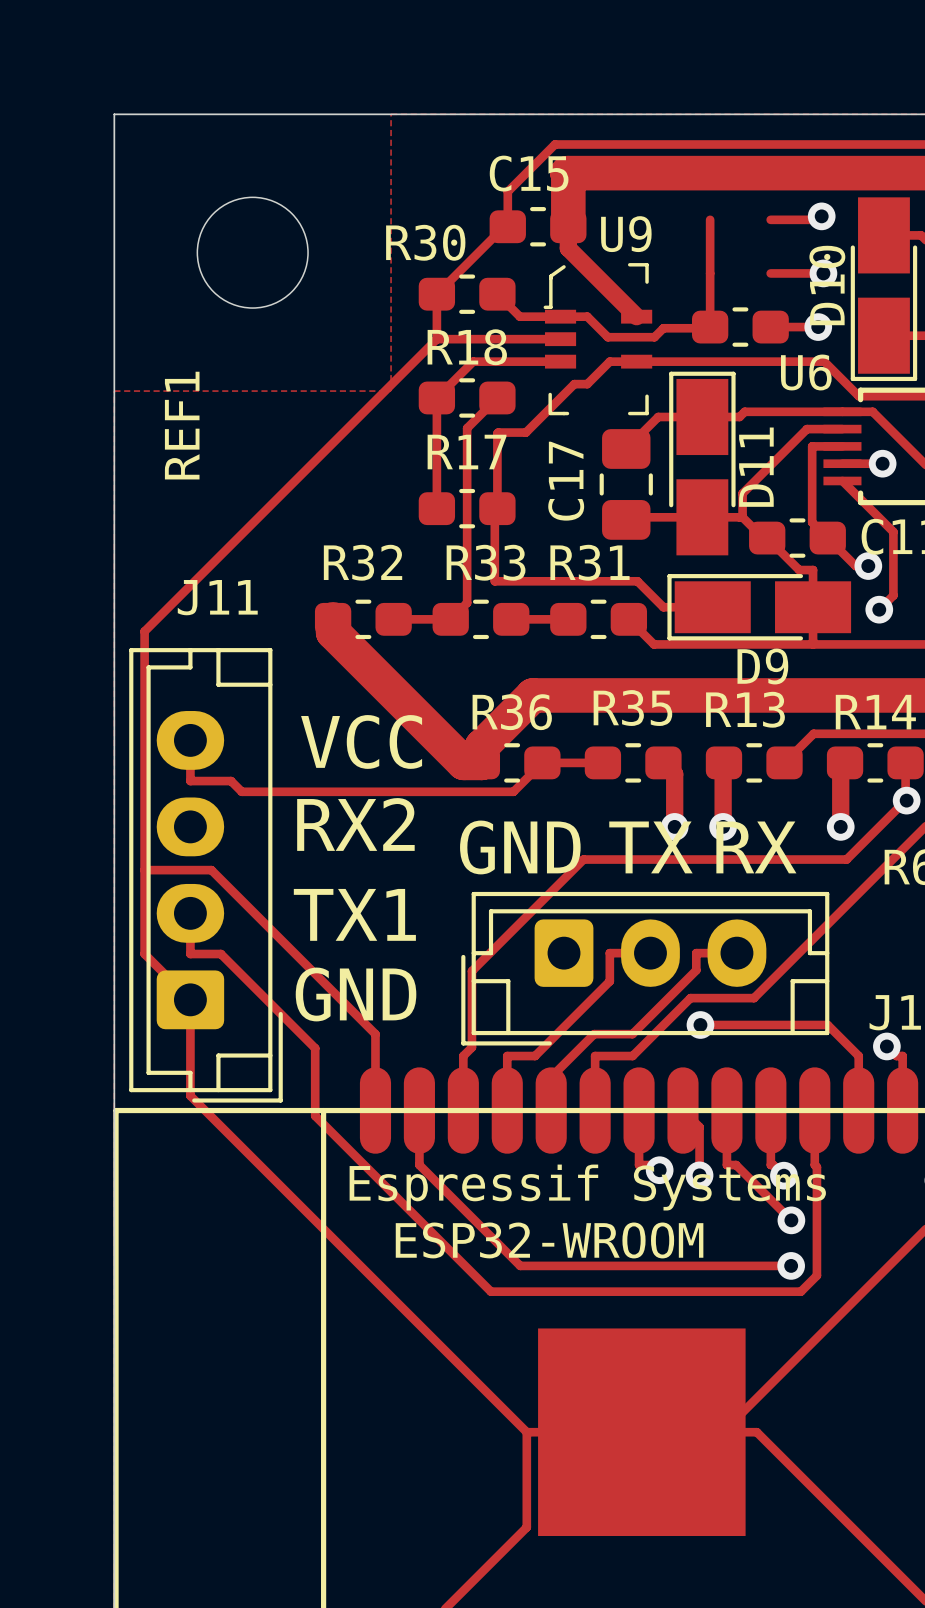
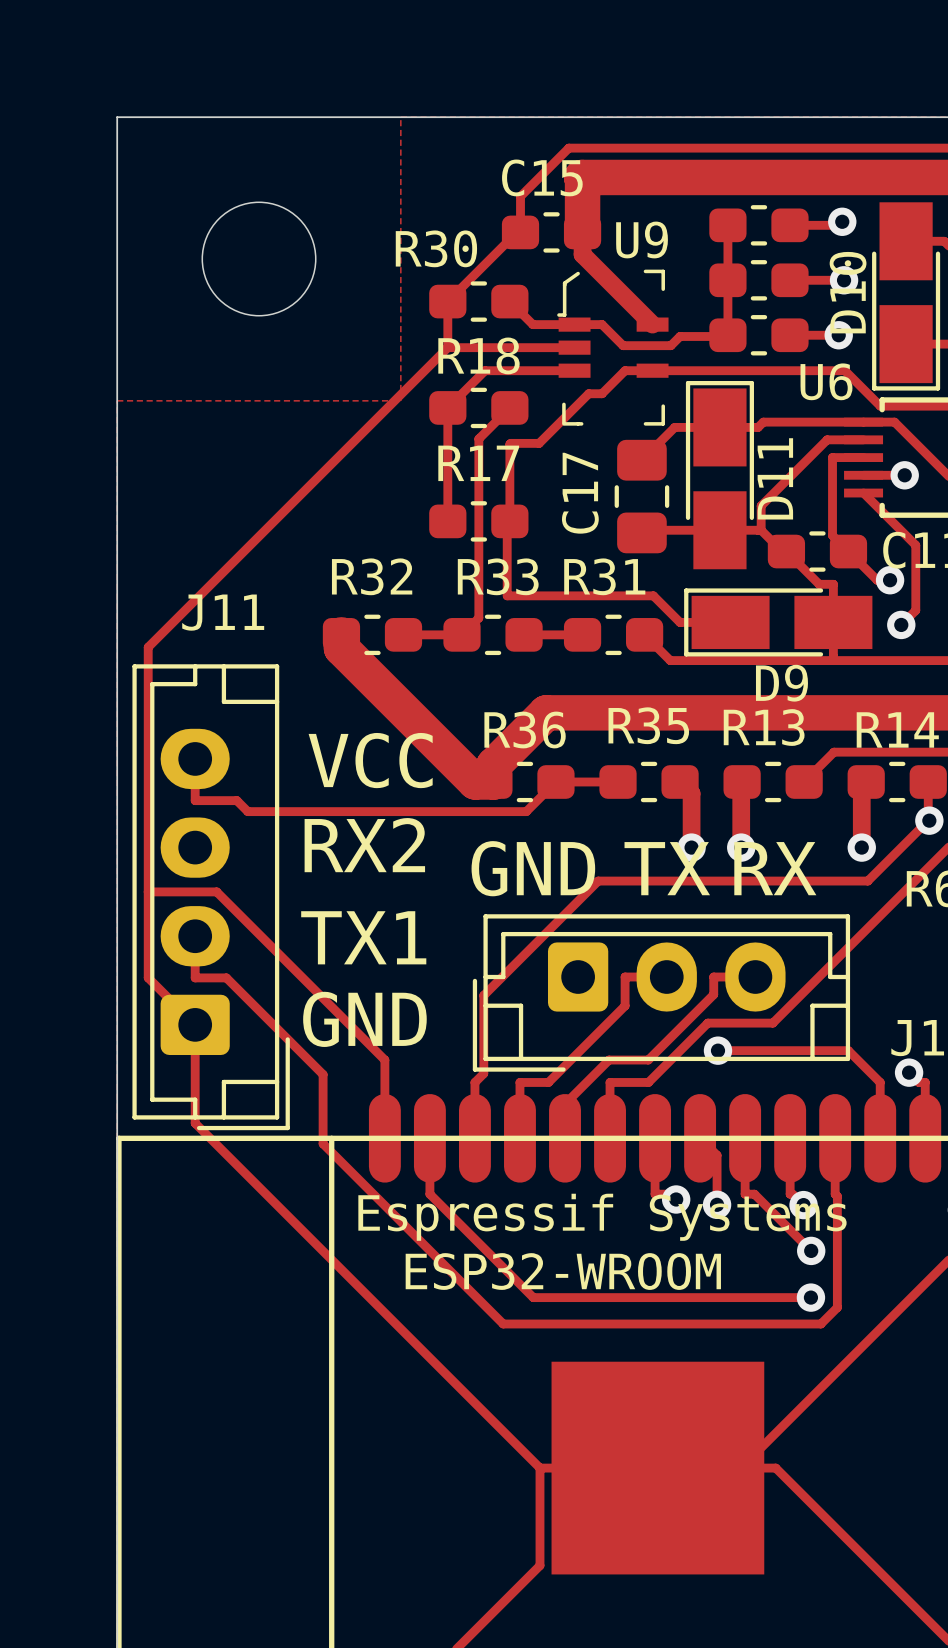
part: none -> (758, 225)
part: none -> (758, 280)
REF1 name: REF1 (182, 425) -> none

